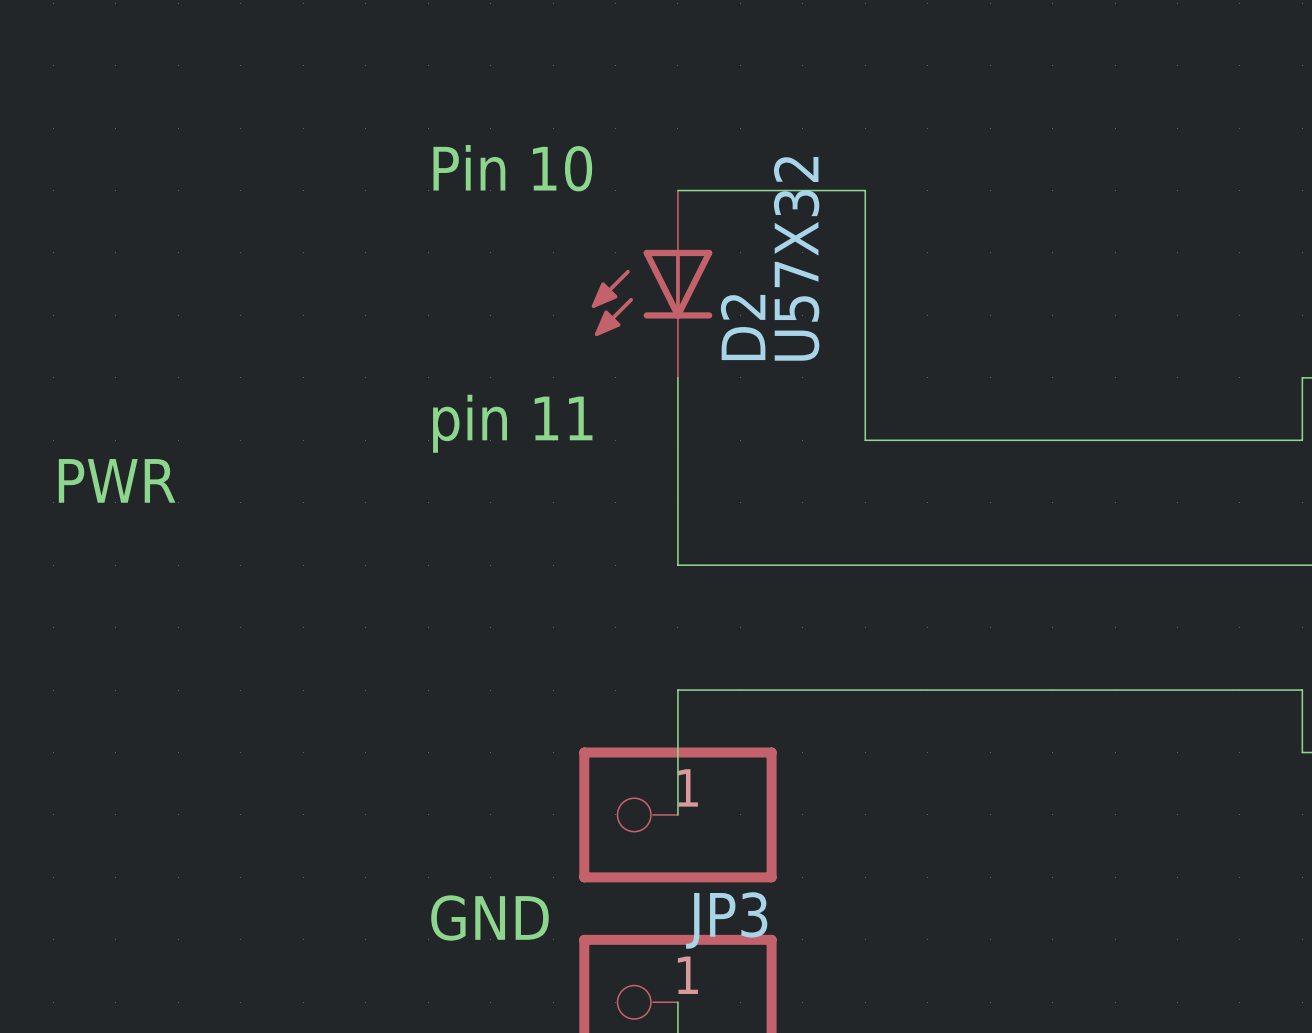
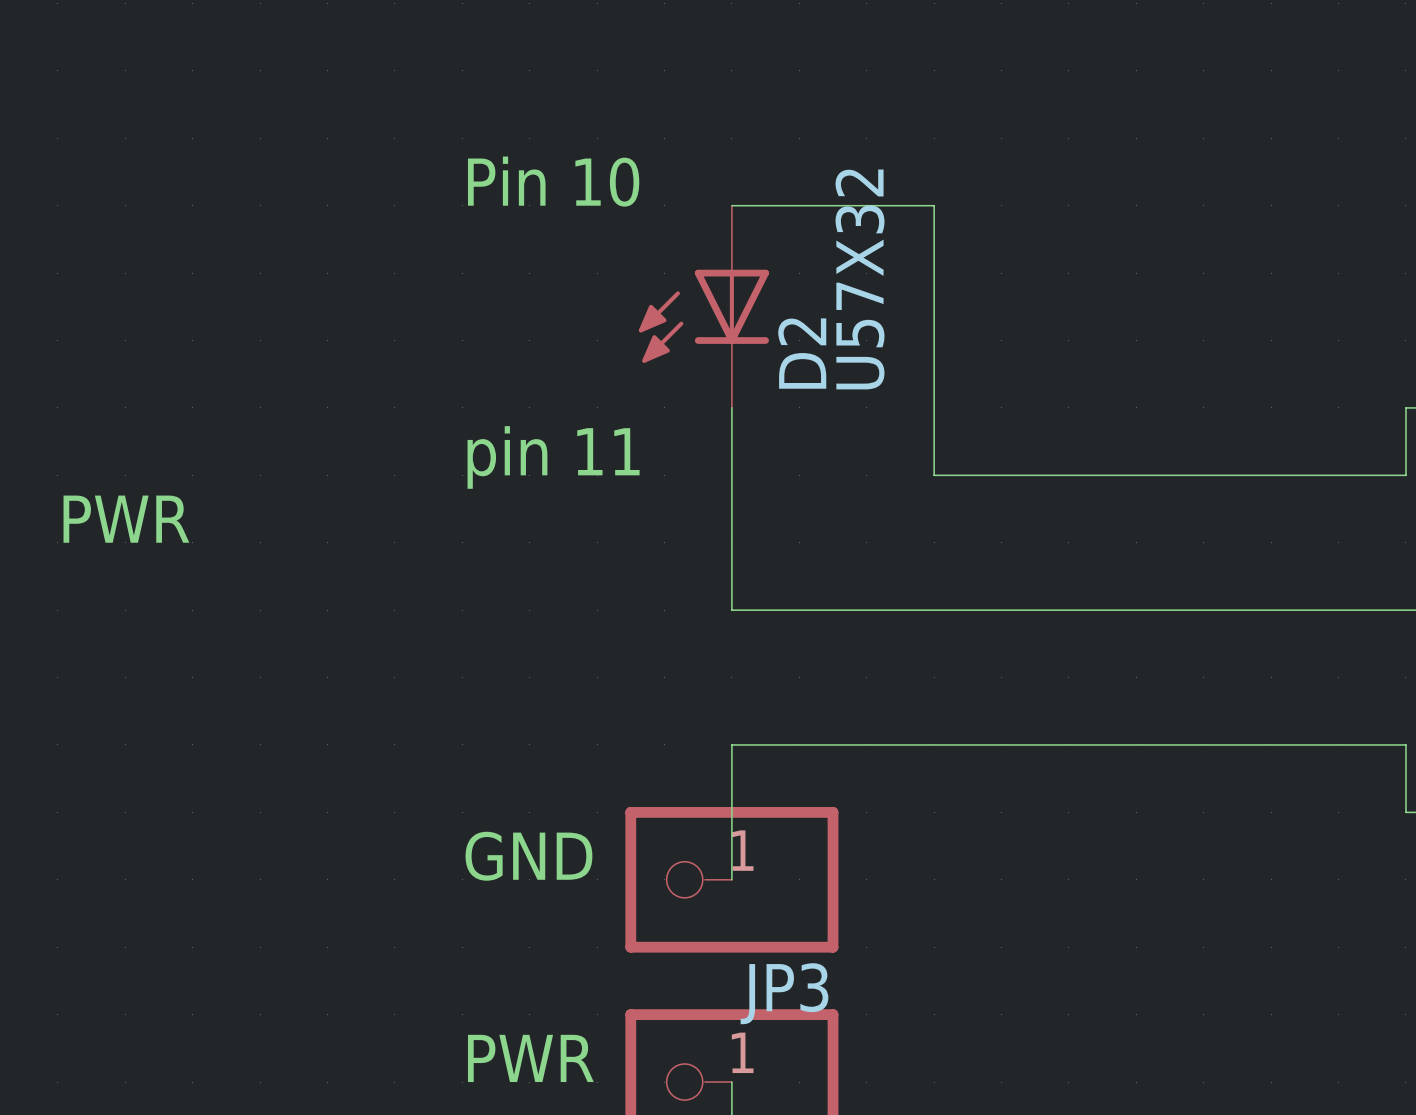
text position: GND (489, 918) -> GND (528, 856)
text: none -> PWR (530, 1058)

